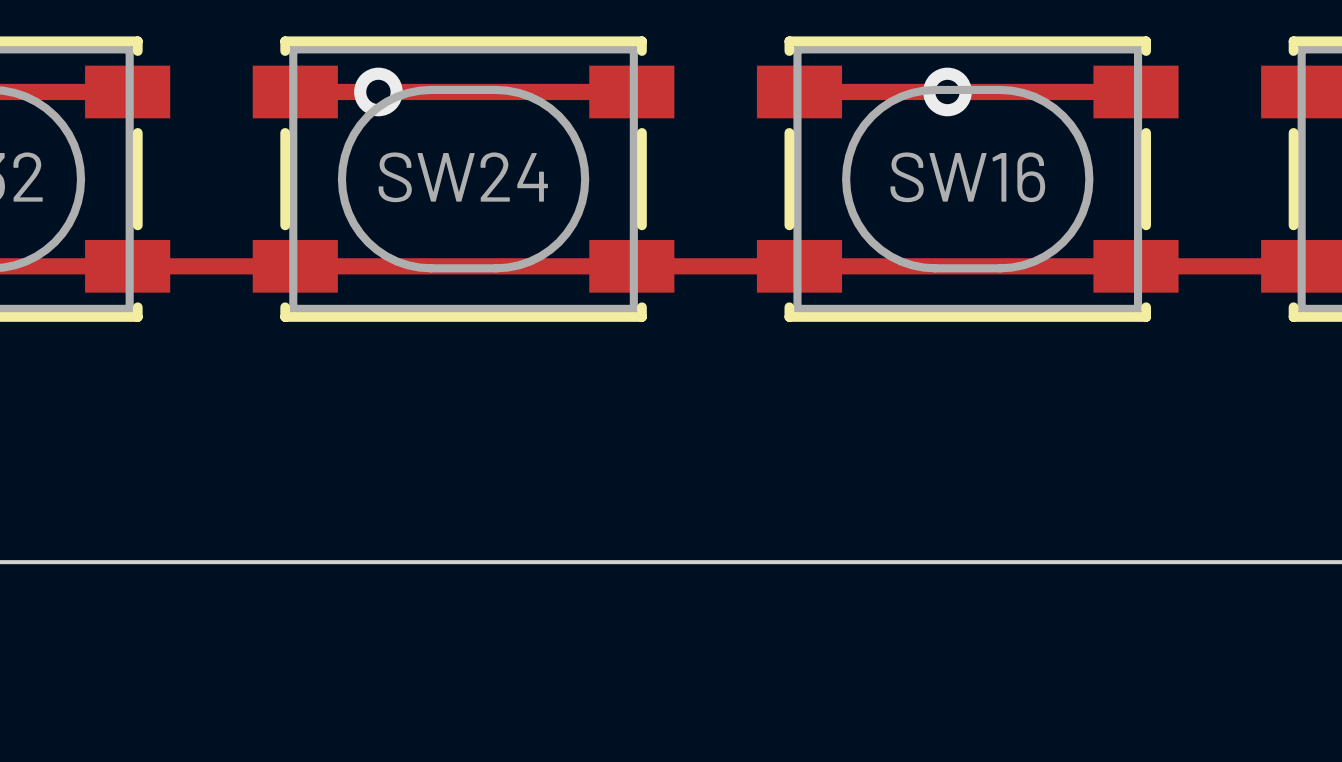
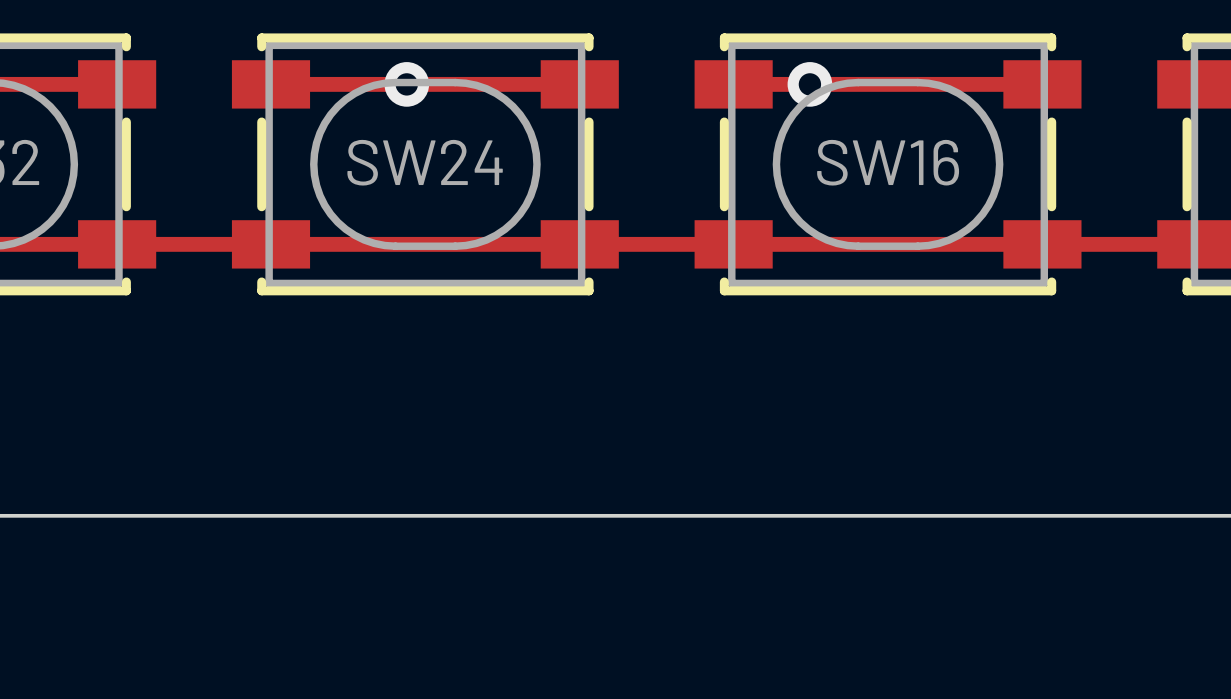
via position: (378, 91) -> (406, 84)
via position: (947, 91) -> (809, 84)

